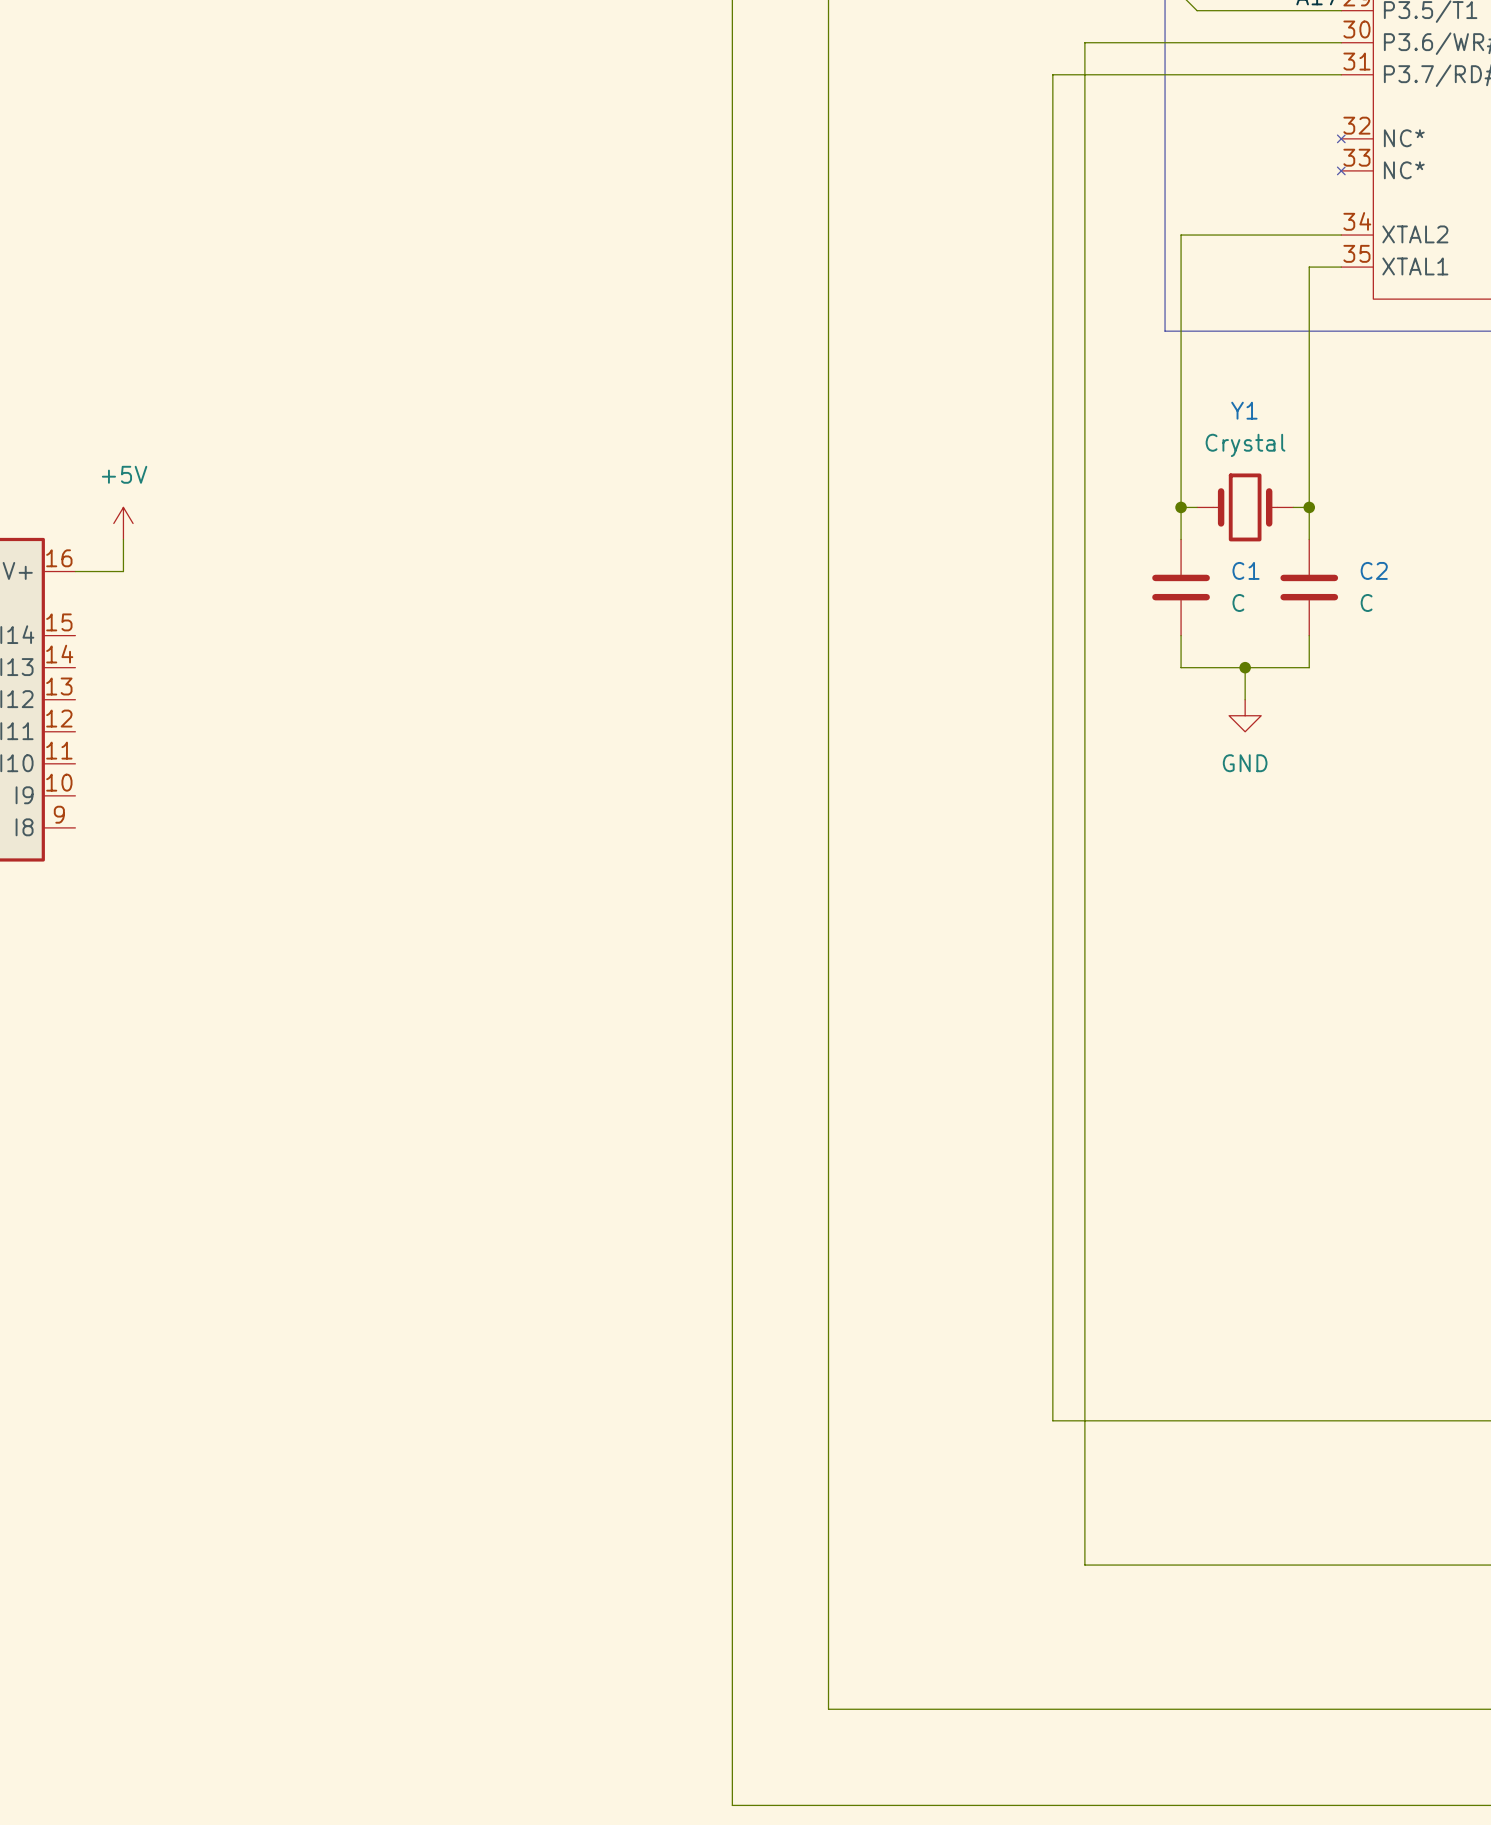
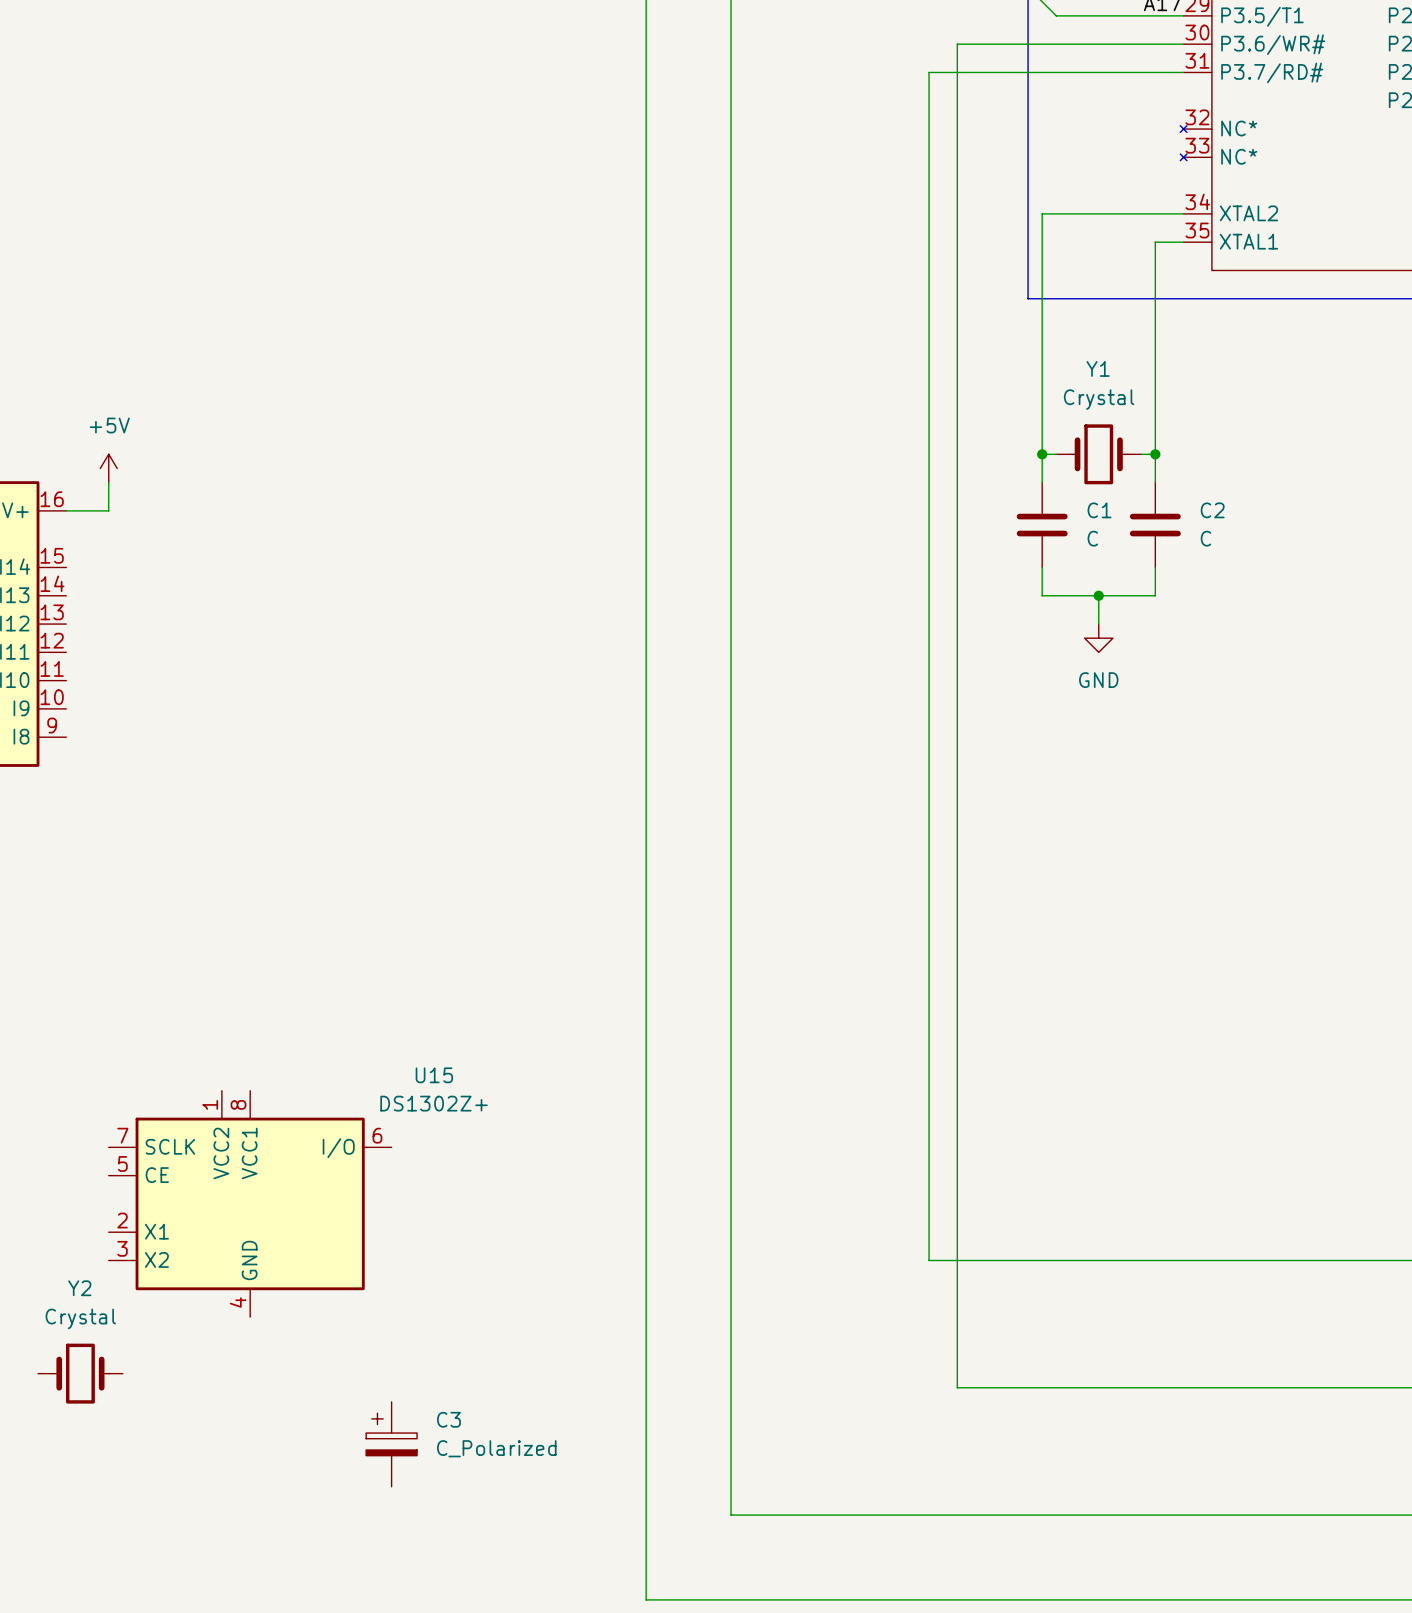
U15: none -> DS1302Z+ (250, 1203)
Y2: none -> Crystal (80, 1373)
C3: none -> C_Polarized (391, 1444)

